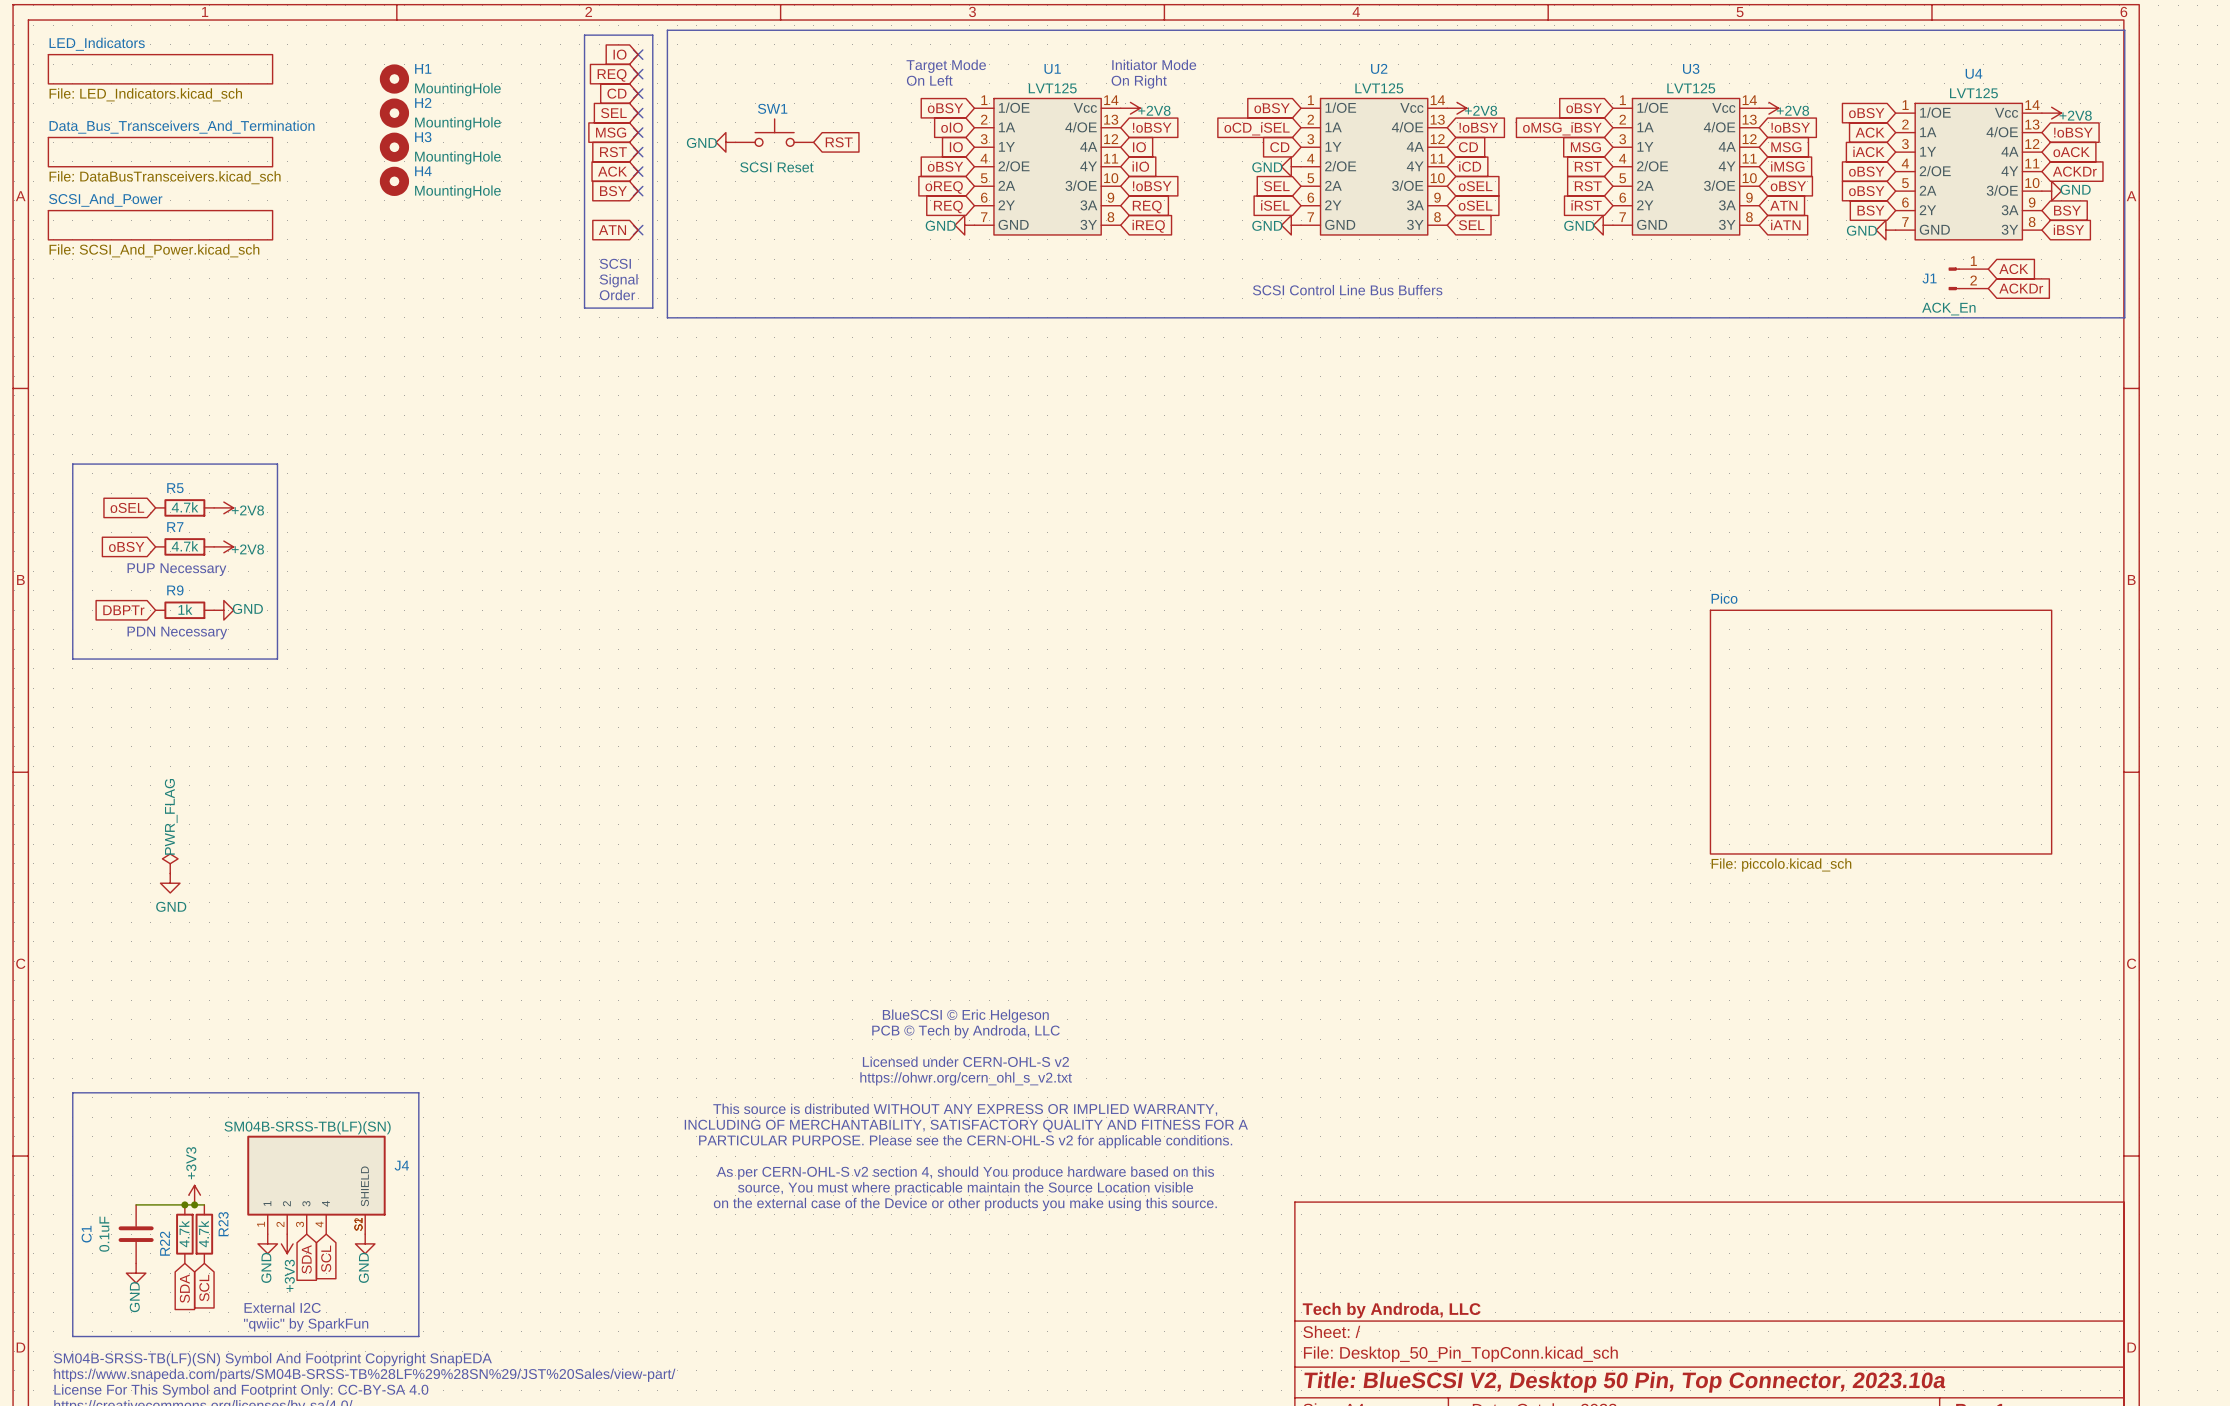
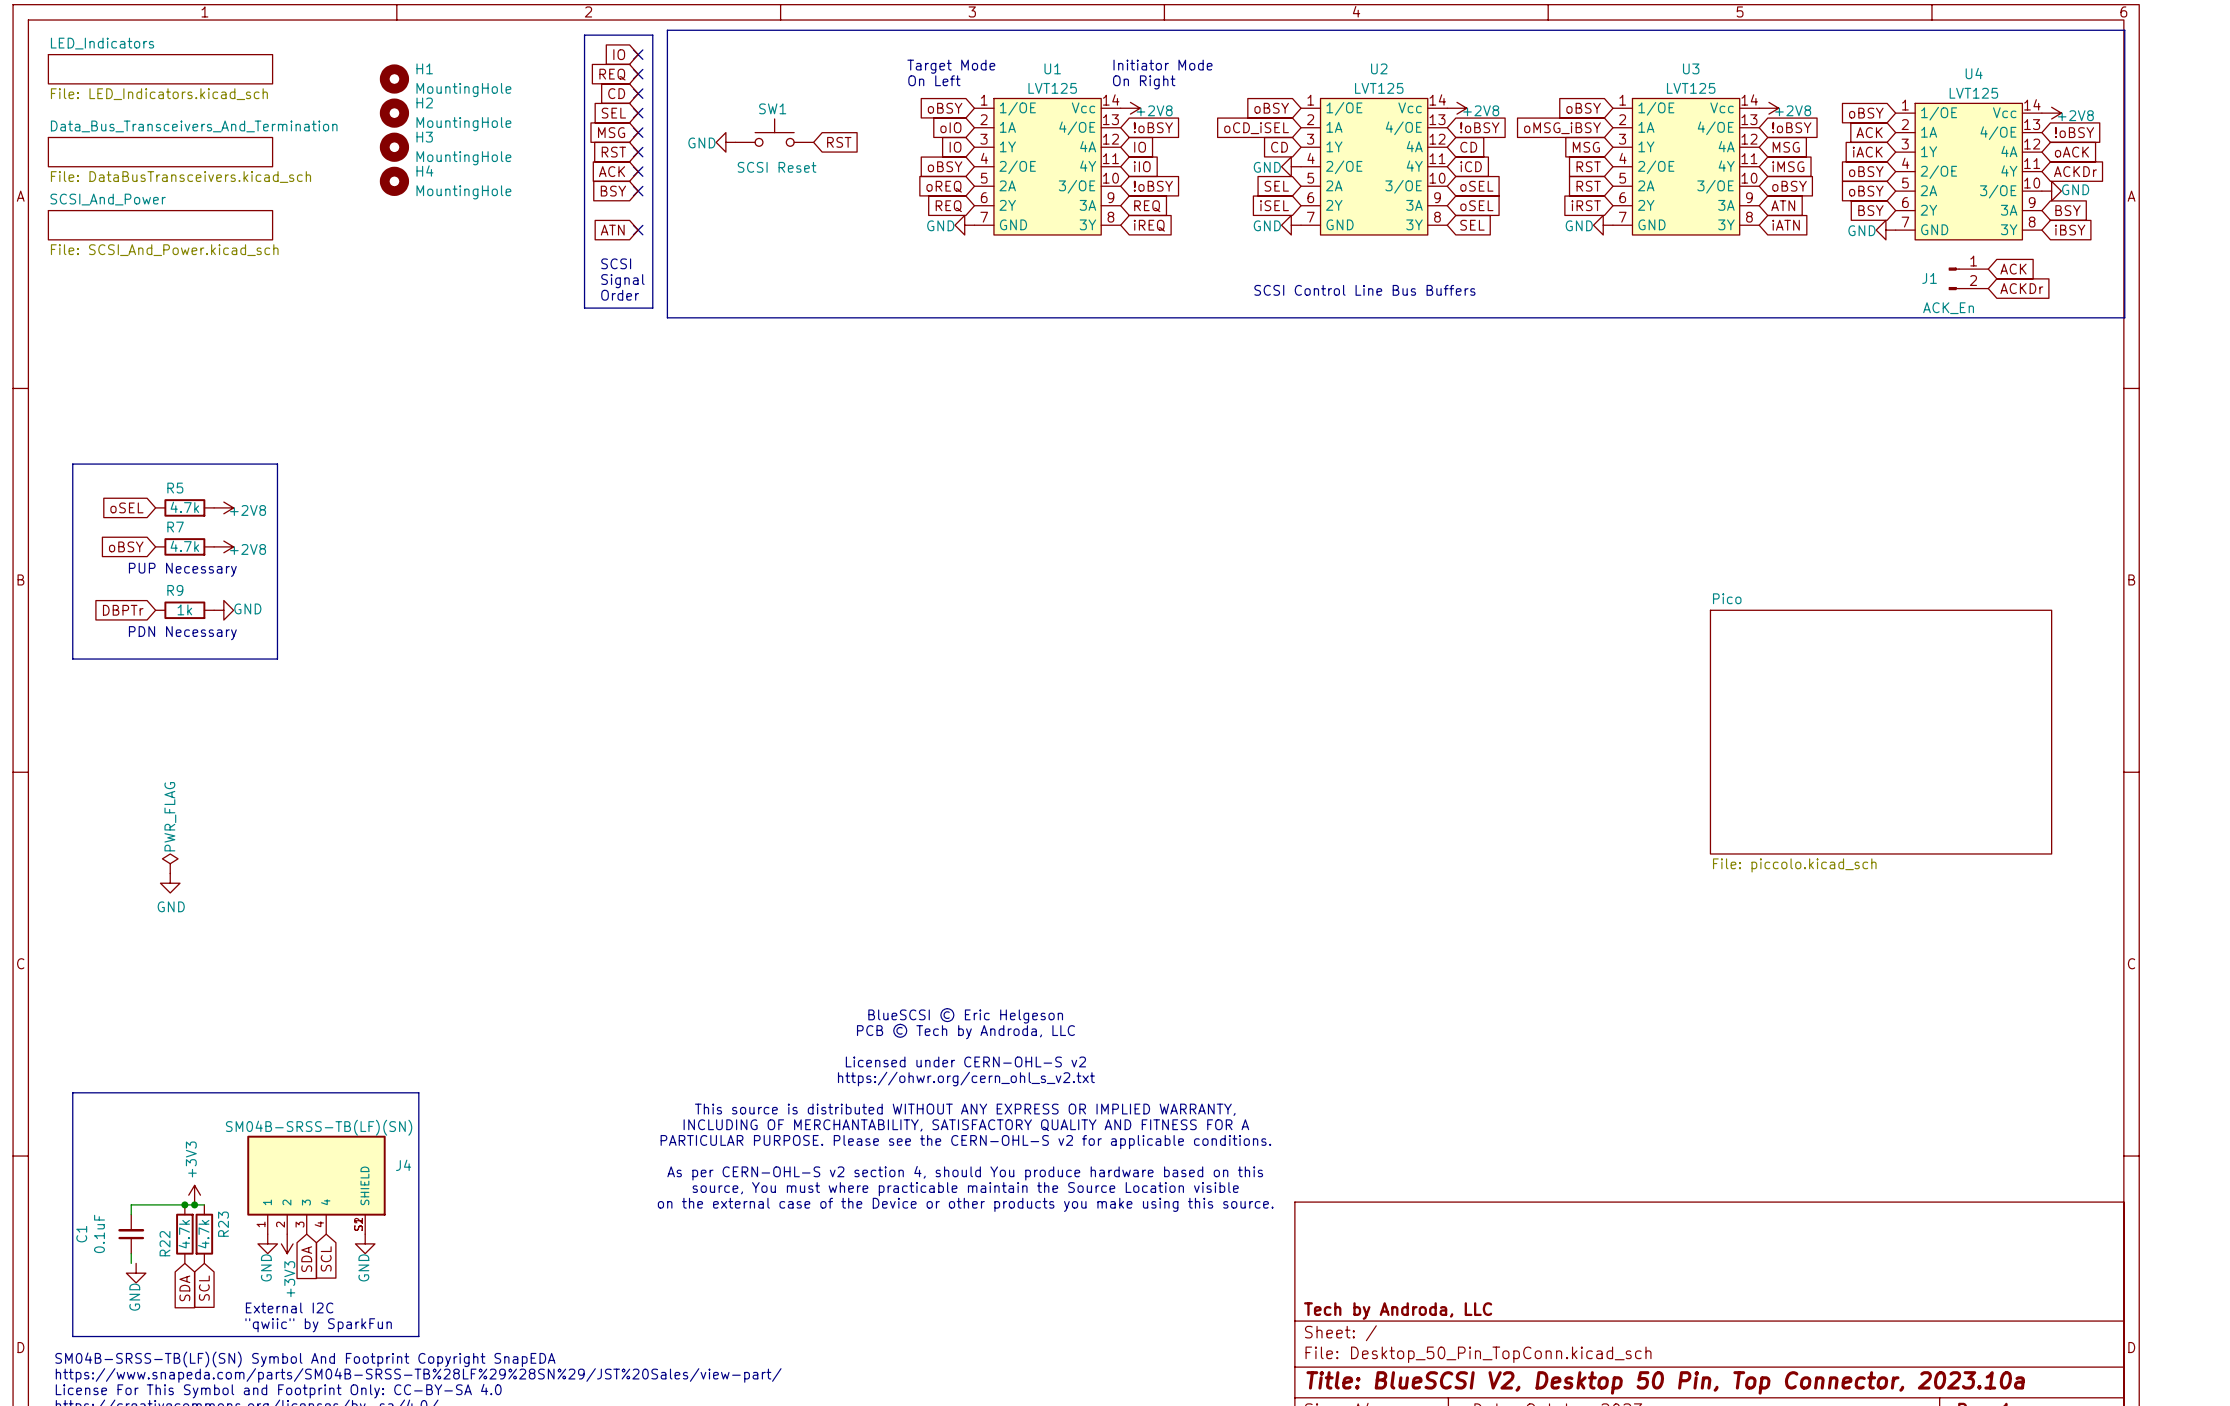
C1 symbol: [118, 1204, 154, 1264] -> [118, 1214, 145, 1254]
wire: none -> (136, 1204) (131, 1204) (131, 1214)
wire: none -> (131, 1253) (131, 1263)

